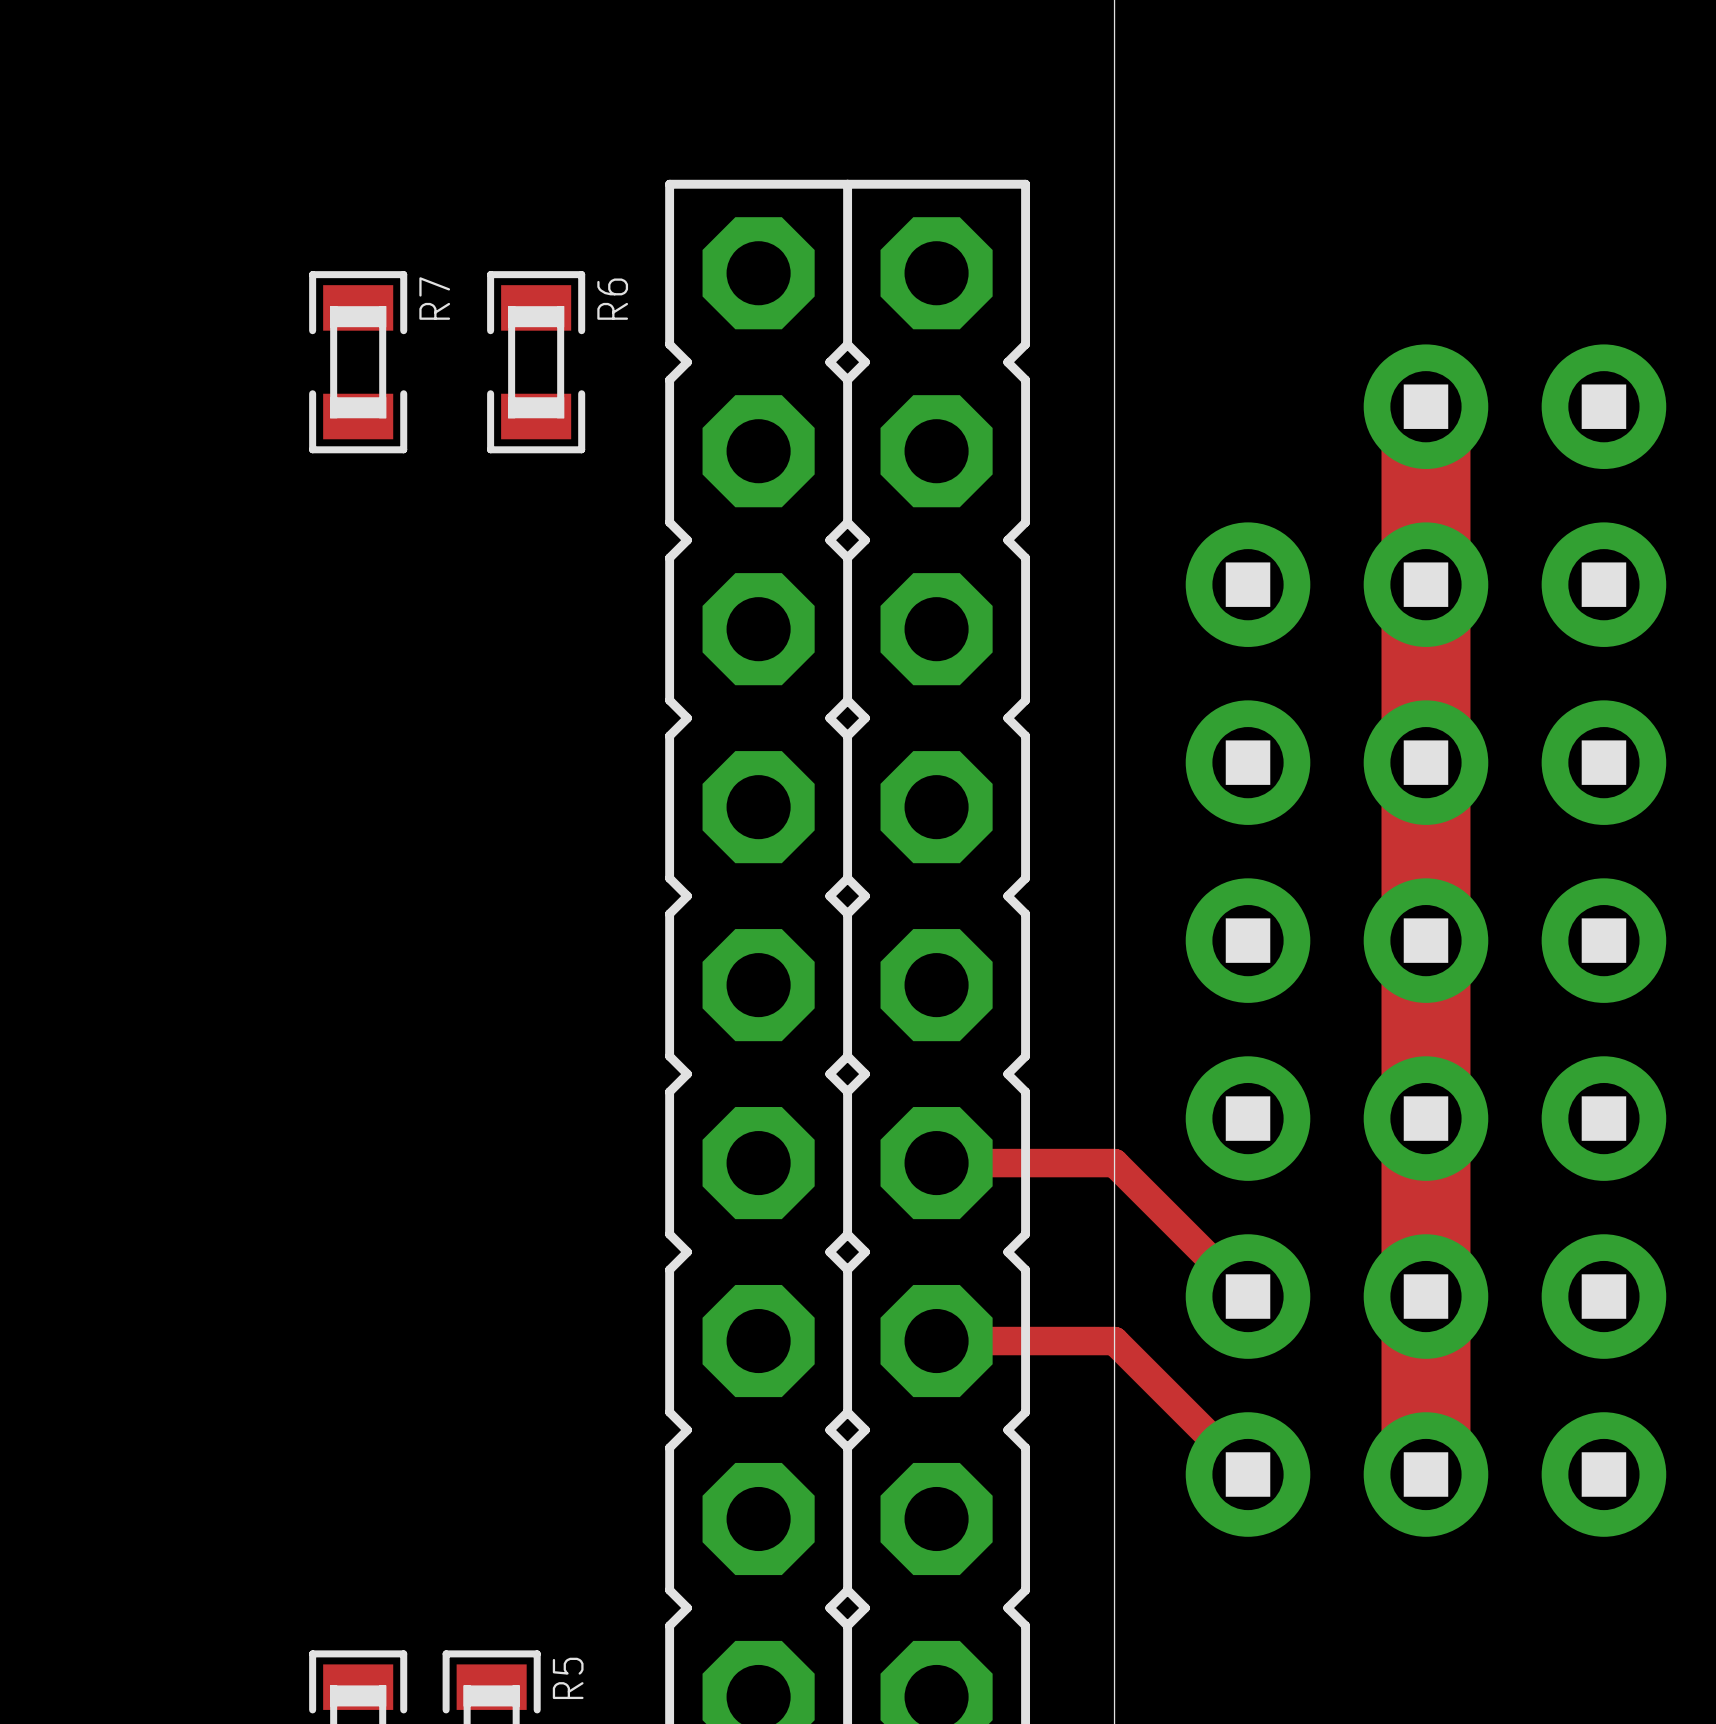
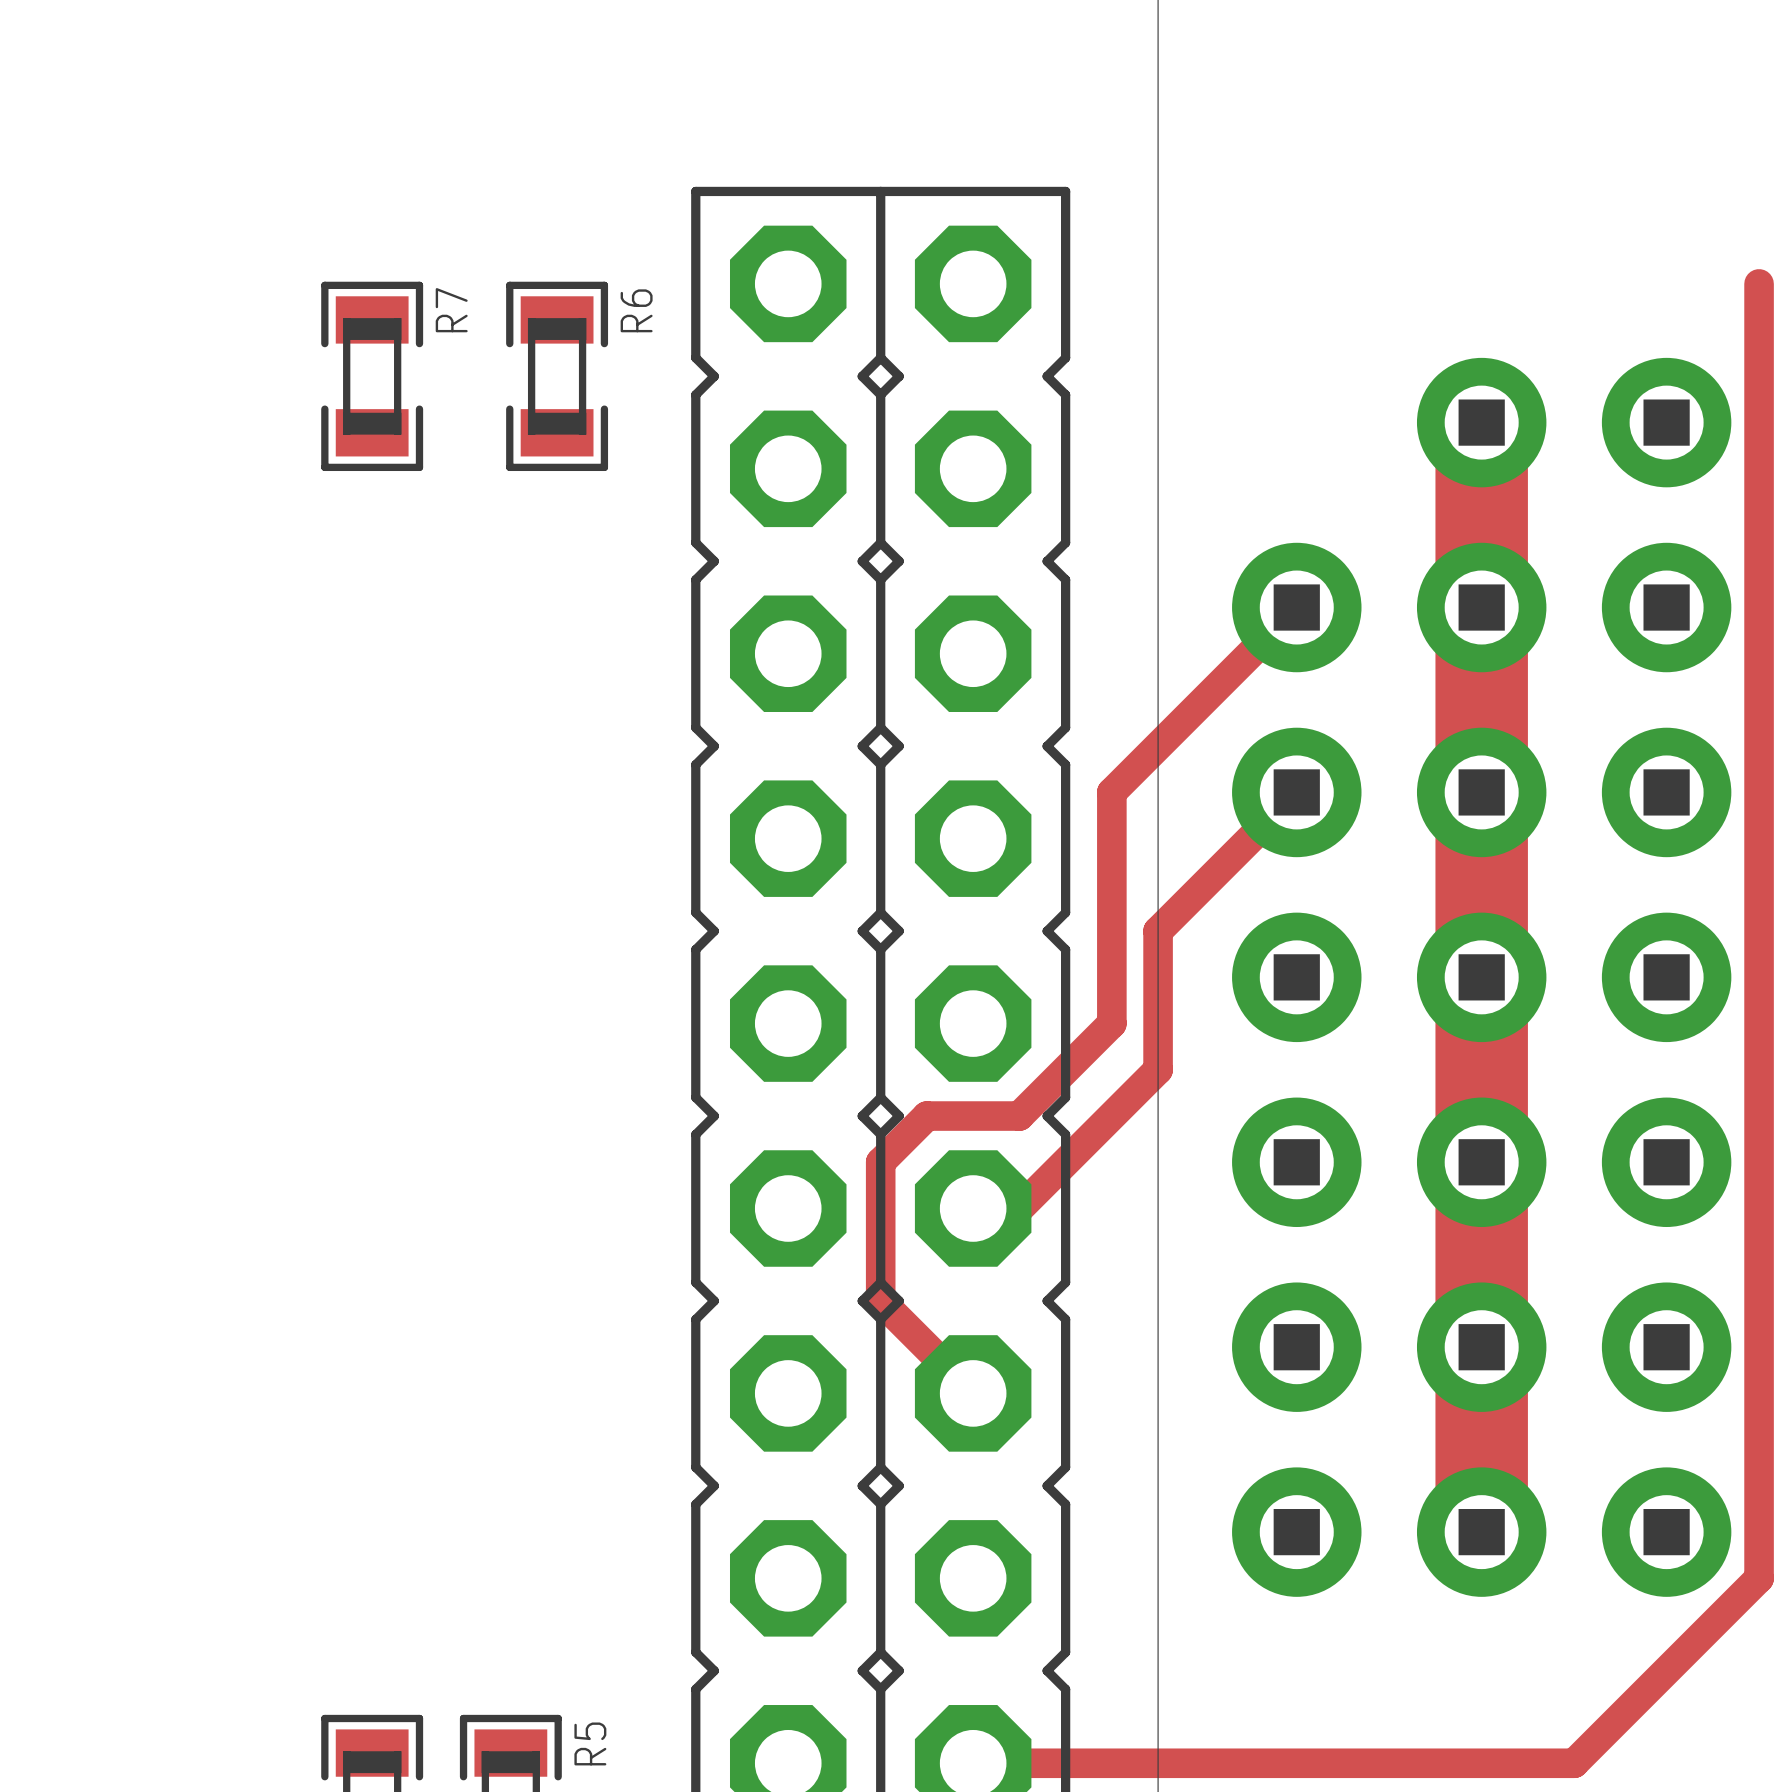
track: none -> (1759, 283) (1759, 1578) (1574, 1763) (973, 1763)
track: (981, 1163) (1114, 1163) (1248, 1296) -> (1019, 1208) (1158, 1069) (1158, 931) (1296, 792)
track: (936, 1341) (1114, 1341) (1248, 1474) -> (973, 1393) (880, 1300) (880, 1162) (926, 1116) (1019, 1116) (1111, 1023) (1111, 792) (1296, 607)

